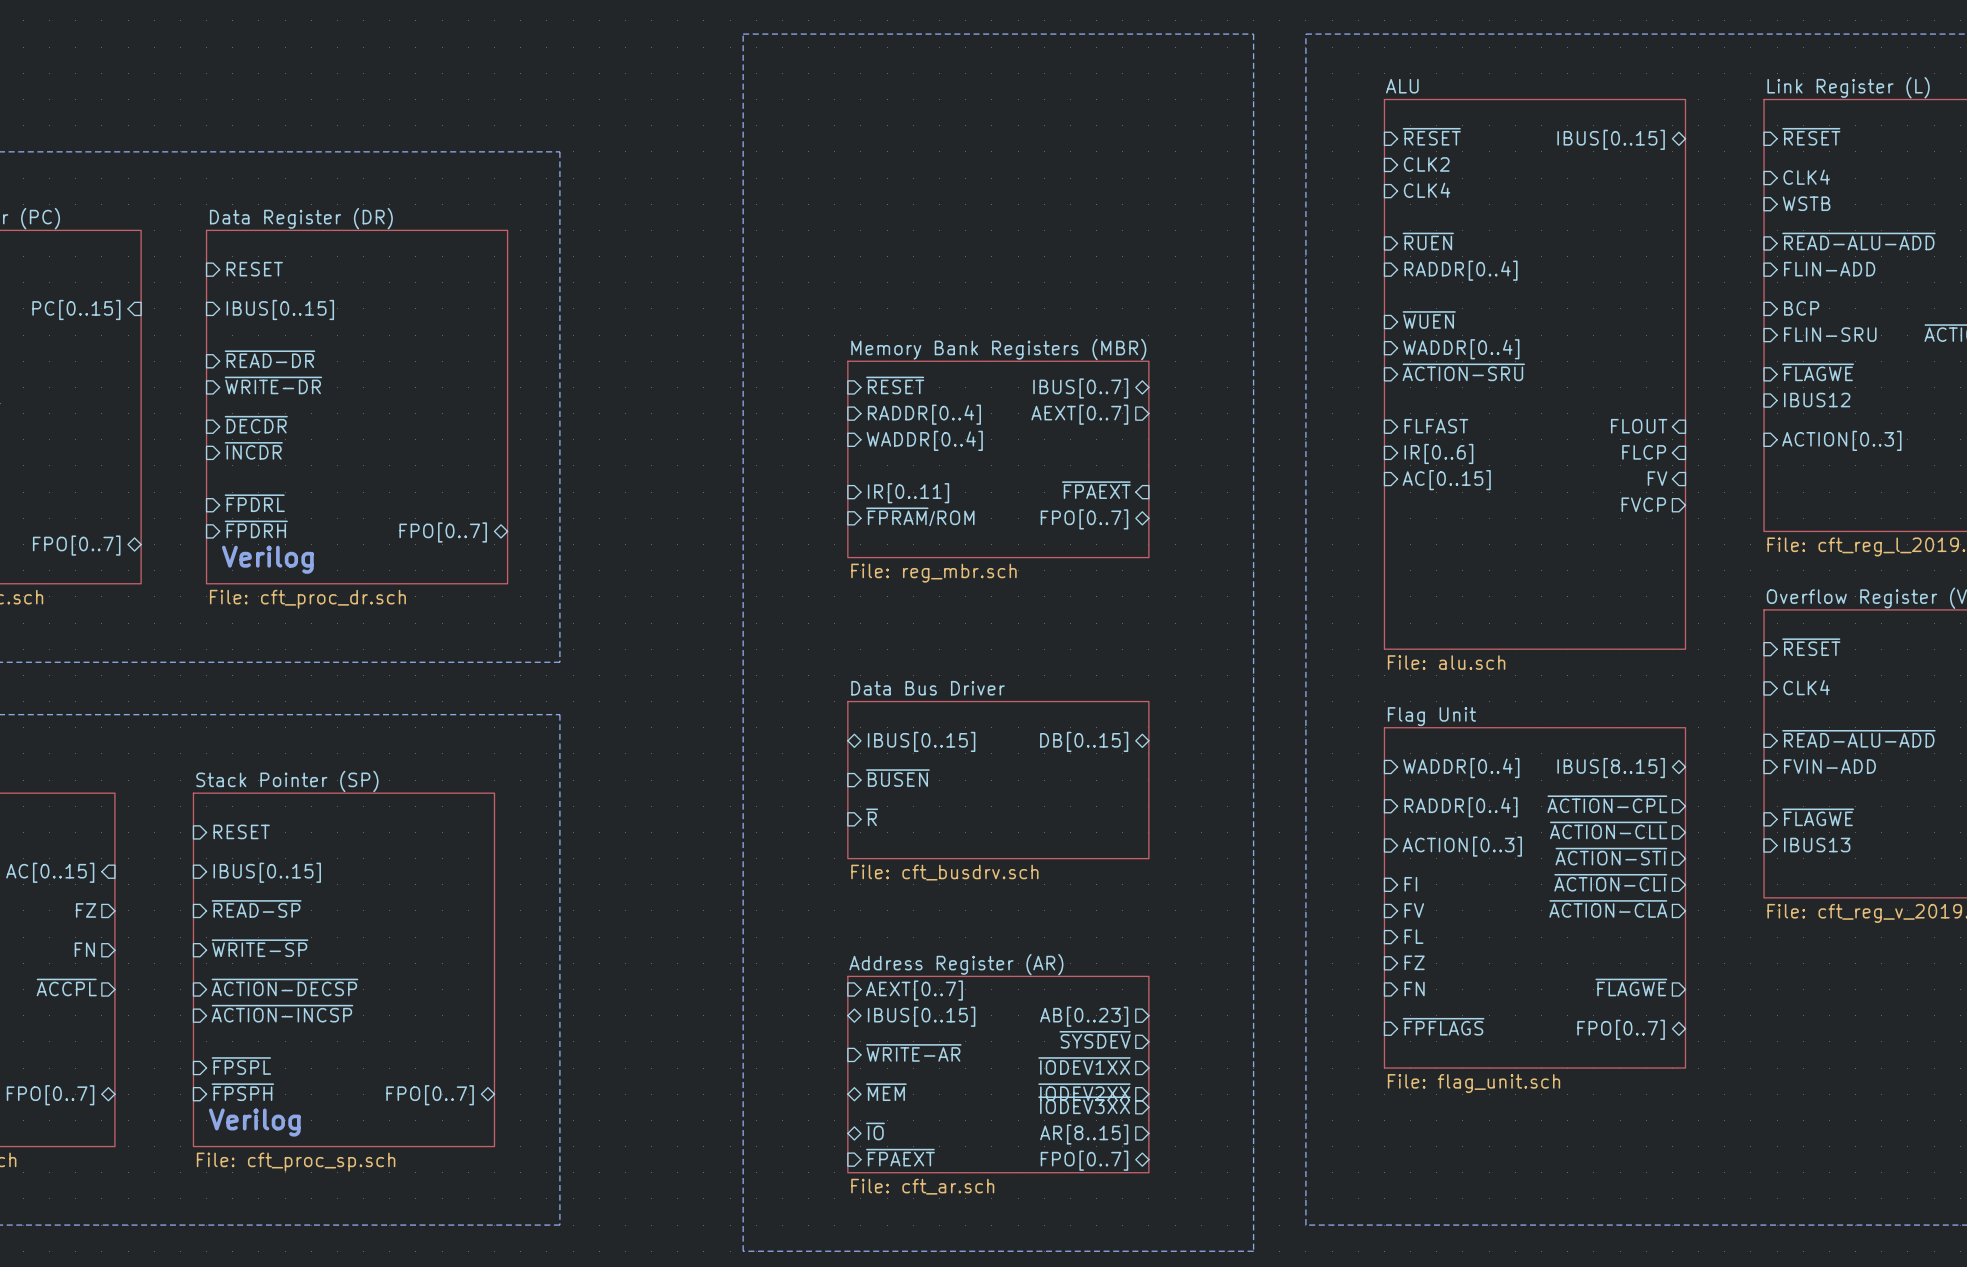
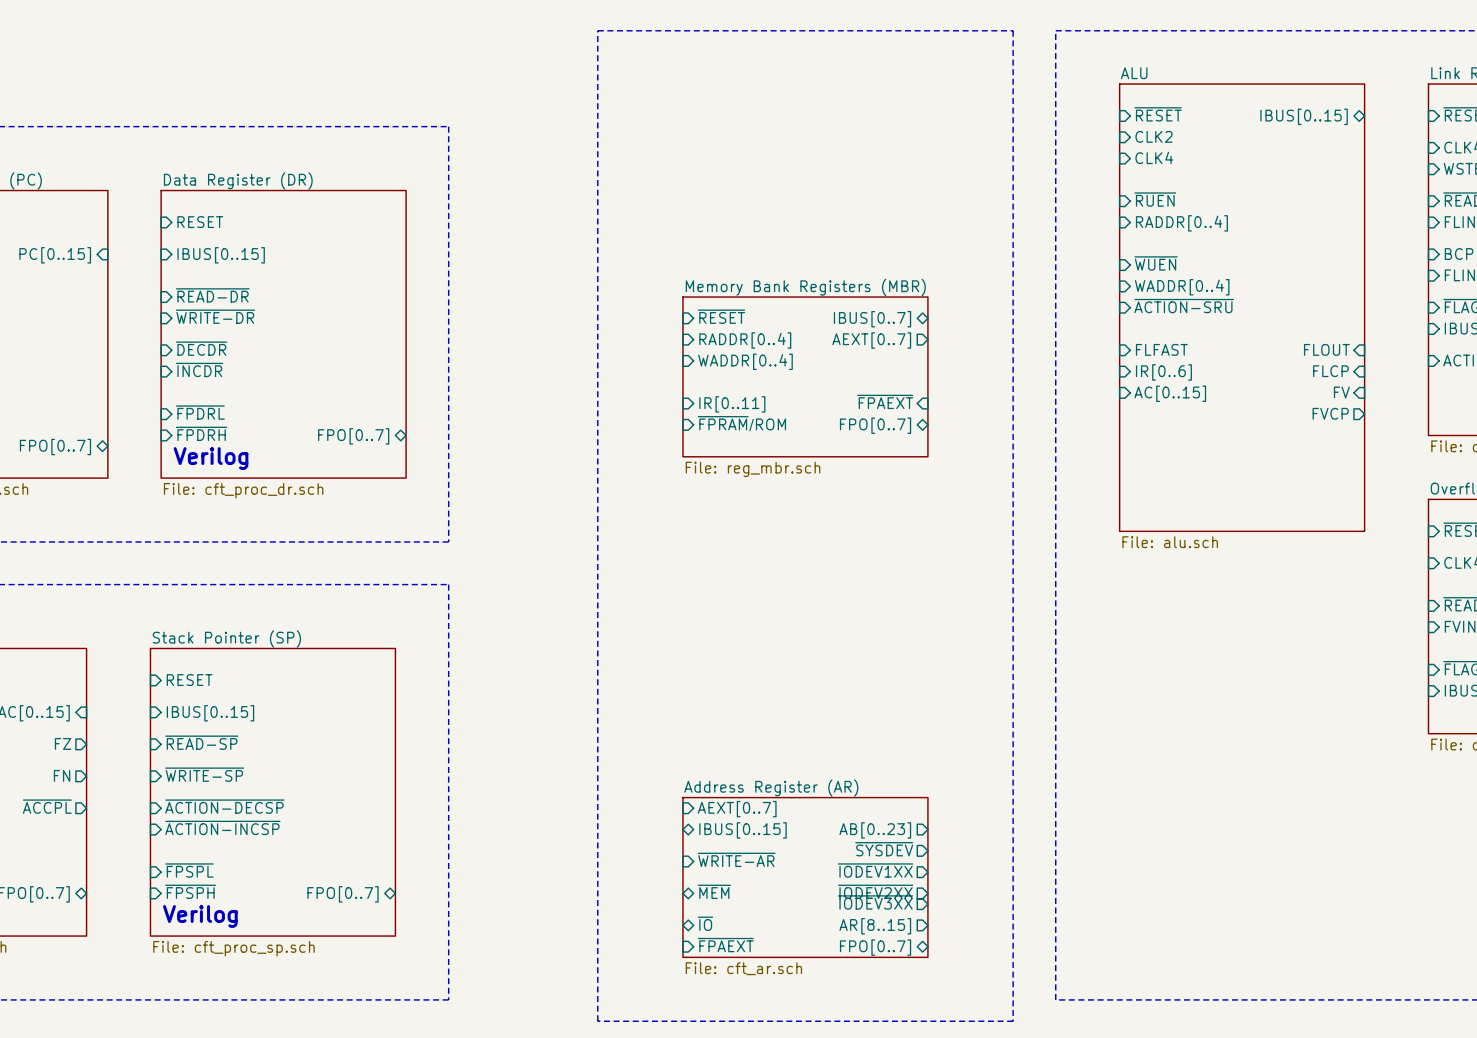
sheet pin: IBUS[0..15] (921, 741) -> none
sheet pin: DB[0..15] (1084, 741) -> none
sheet pin: WADDR[0..4] (1461, 768) -> none
sheet pin: IBUS[8..15] (1611, 768) -> none
sheet pin: ~{BUSEN} (897, 778) -> none
sheet Data Bus Driver: File: cft_busdrv.sch (998, 780) -> none
sheet pin: ~{ACTION-CPL} (1607, 804) -> none
sheet pin: RADDR[0..4] (1461, 807) -> none
sheet pin: ~{R} (872, 817) -> none
sheet pin: ~{ACTION-CLL} (1608, 830) -> none
sheet pin: ACTION[0..3] (1462, 846) -> none
sheet pin: ~{ACTION-STI} (1611, 856) -> none
sheet pin: ~{ACTION-CLI} (1610, 882) -> none
sheet pin: FI (1410, 884) -> none
sheet Flag Unit: File: flag_unit.sch (1534, 897) -> none
sheet pin: ~{ACTION-CLA} (1608, 908) -> none
sheet pin: FV (1414, 910) -> none
sheet pin: FL (1413, 936) -> none
sheet pin: FZ (1414, 962) -> none
sheet pin: ~{FLAGWE} (1631, 987) -> none
sheet pin: FN (1414, 989) -> none
sheet pin: ~{FPFLAGS} (1443, 1026) -> none
sheet pin: FPO[0..7] (1621, 1029) -> none

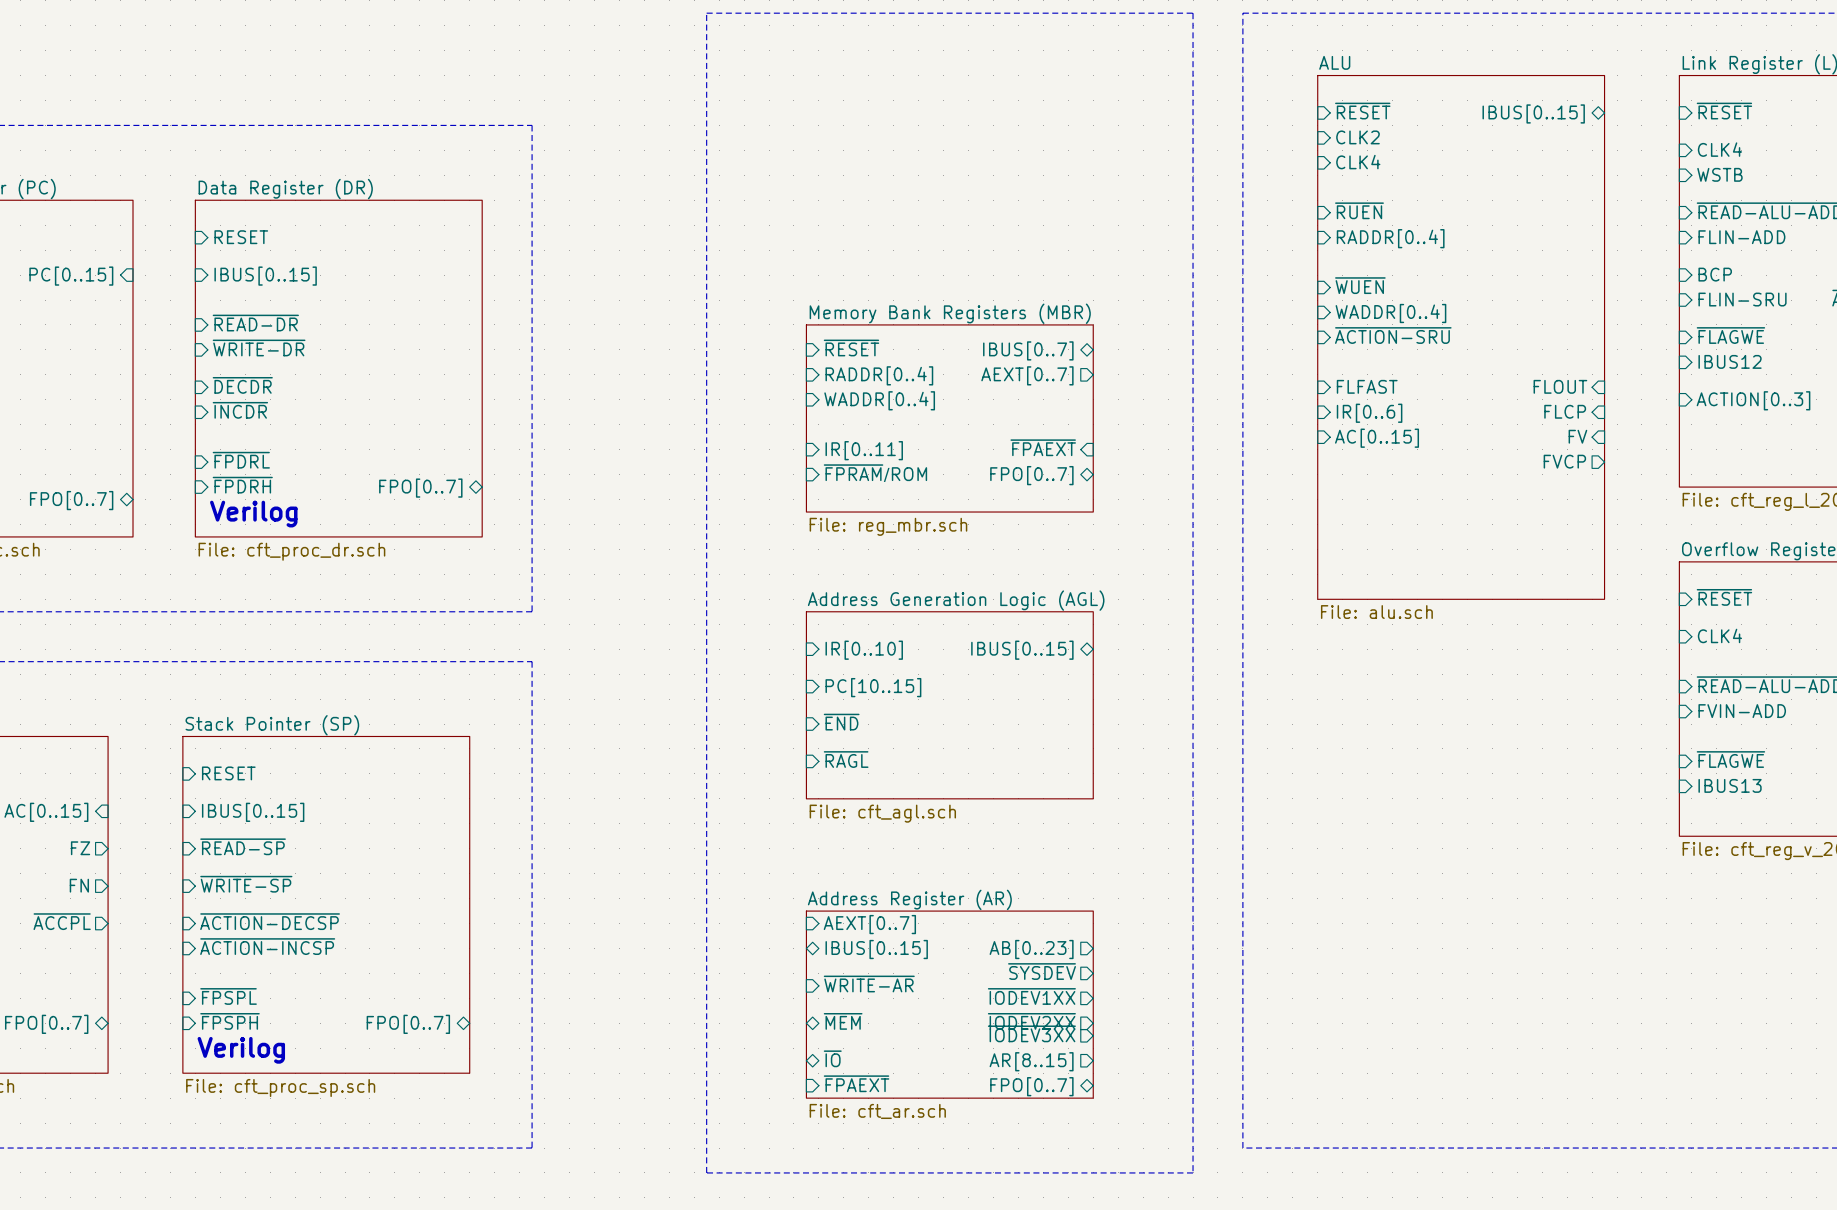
sheet pin: none -> IR[0..10] (864, 650)
sheet pin: none -> IBUS[0..15] (1022, 650)
sheet pin: none -> PC[10..15] (873, 687)
sheet Address Generation Logic (AGL): none -> File: cft_agl.sch (949, 705)
sheet pin: none -> ~{END} (841, 722)
sheet pin: none -> ~{RAGL} (846, 759)

